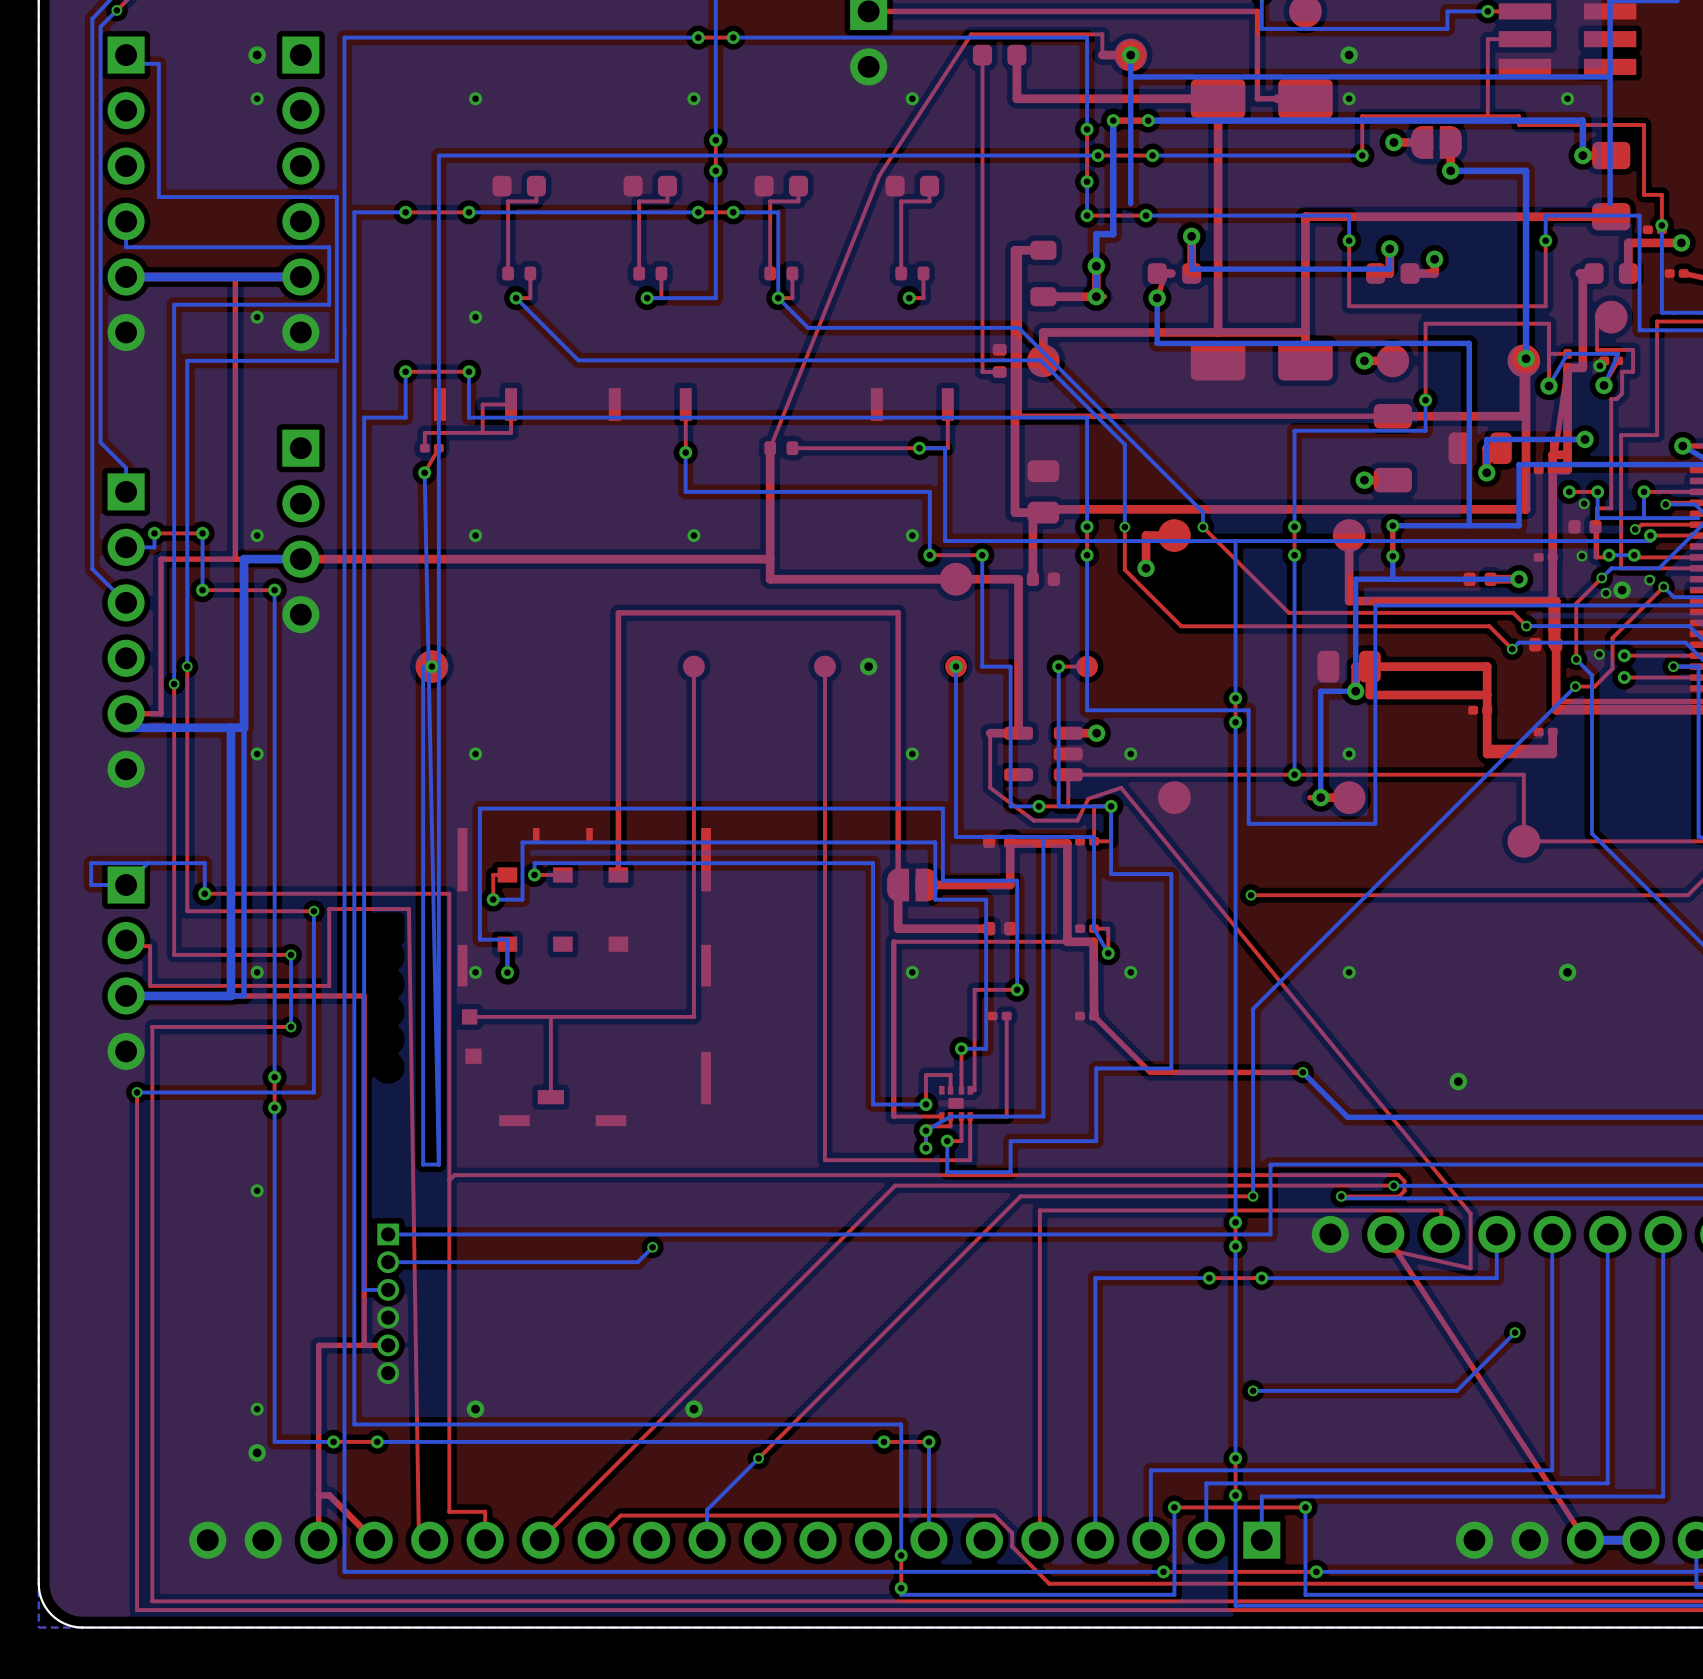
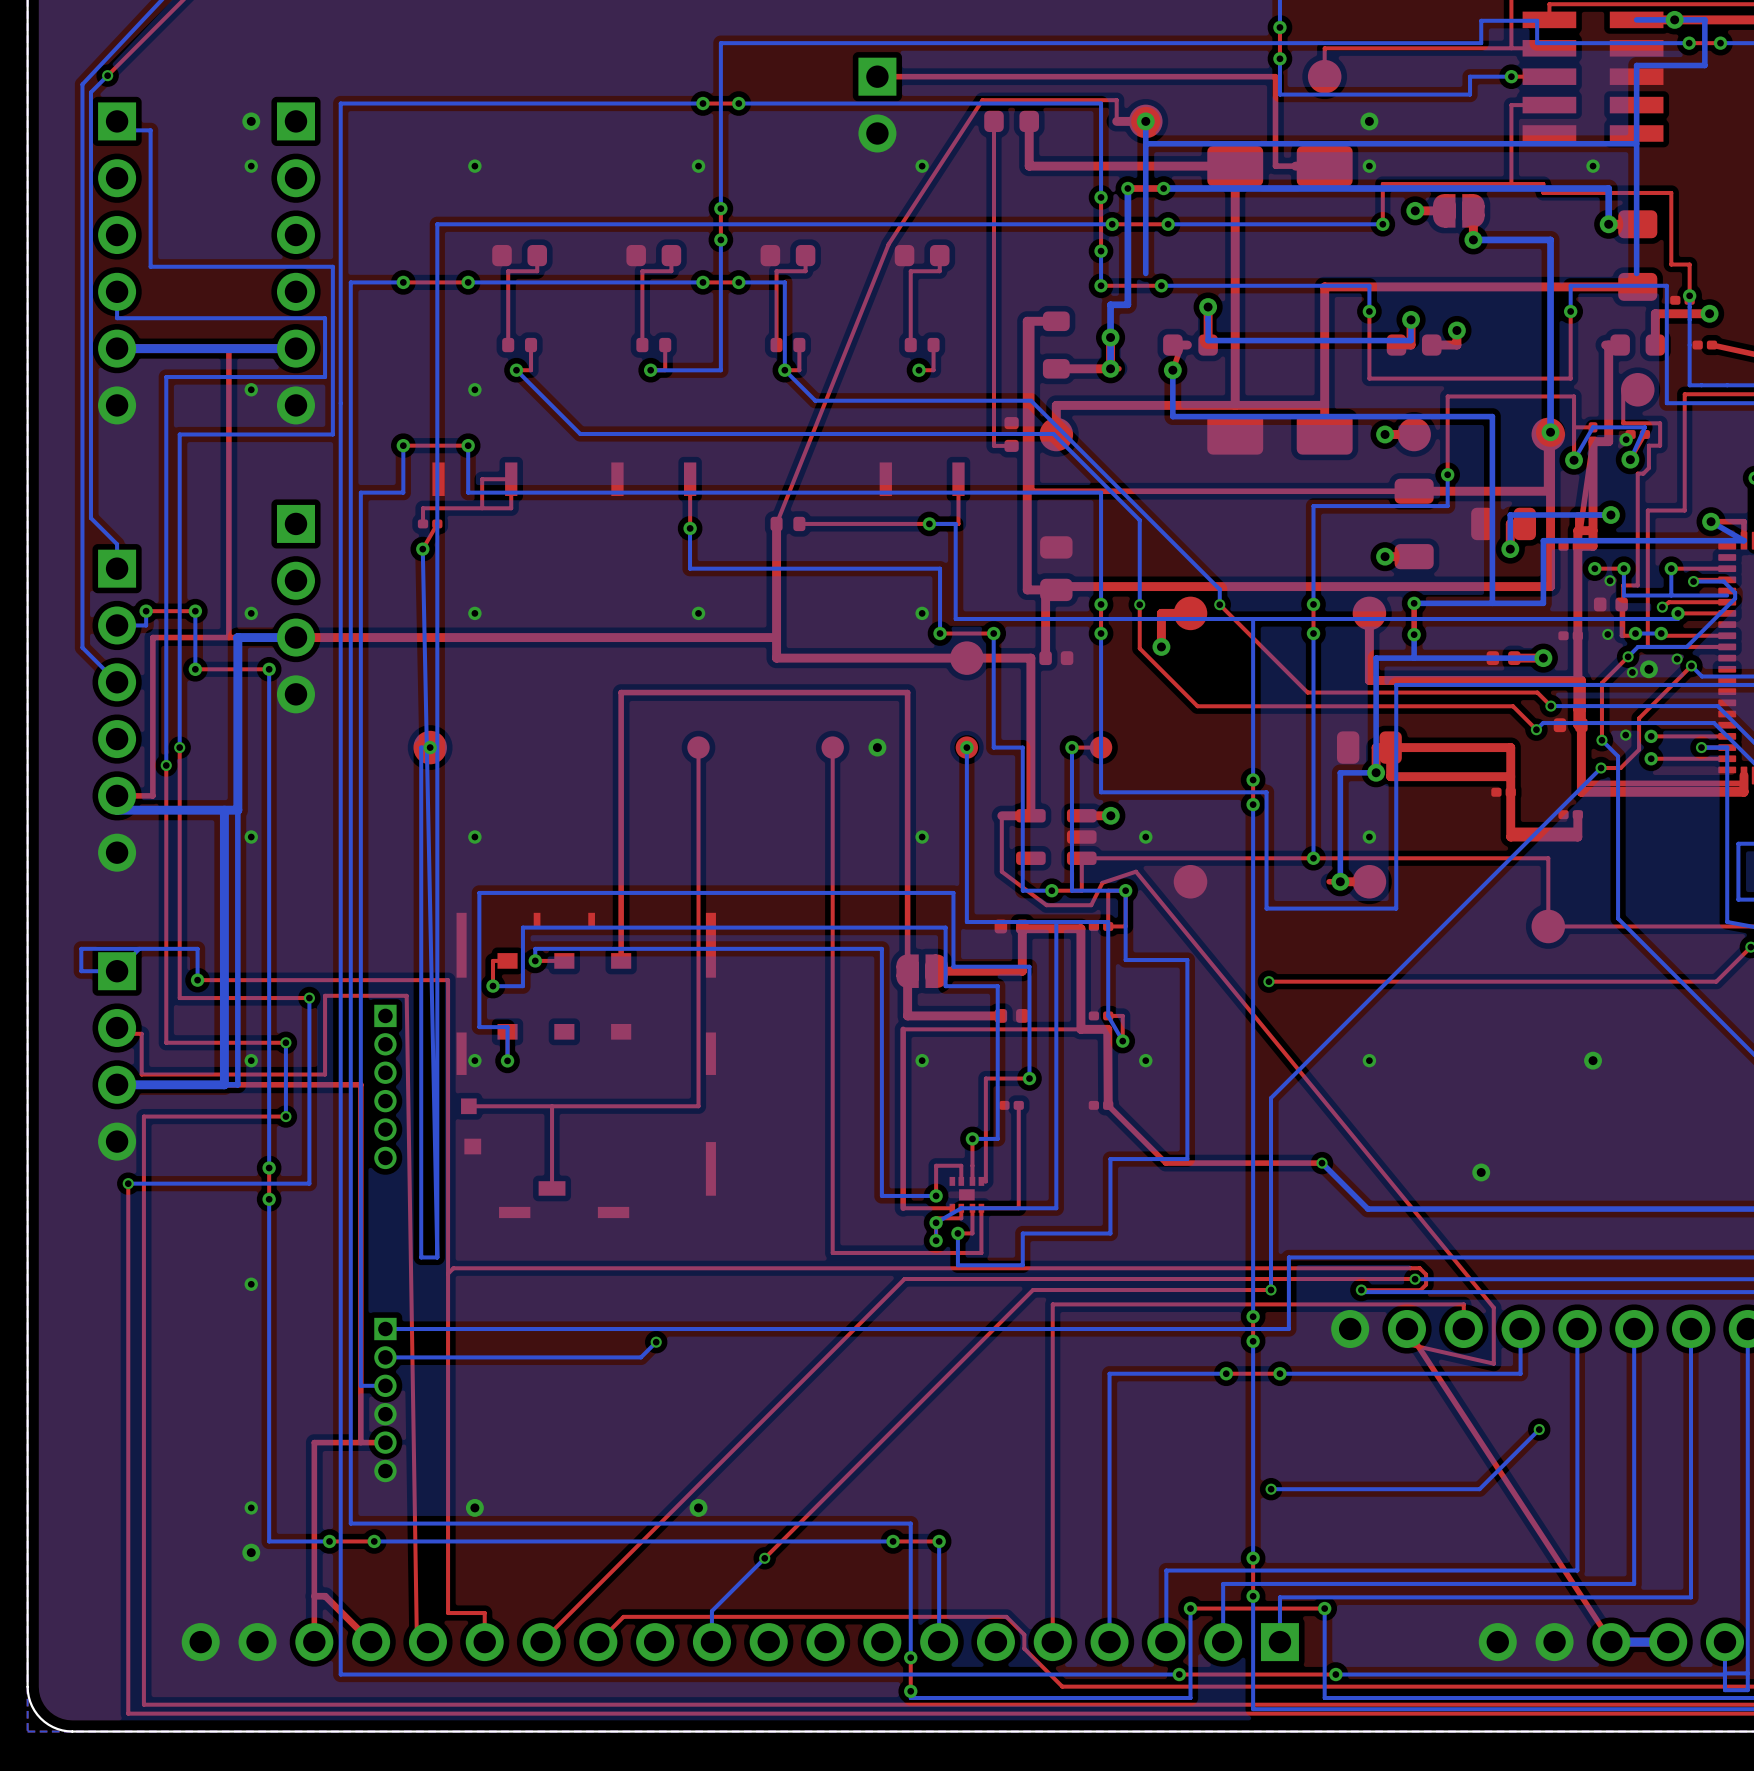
part: none -> (385, 1086)

